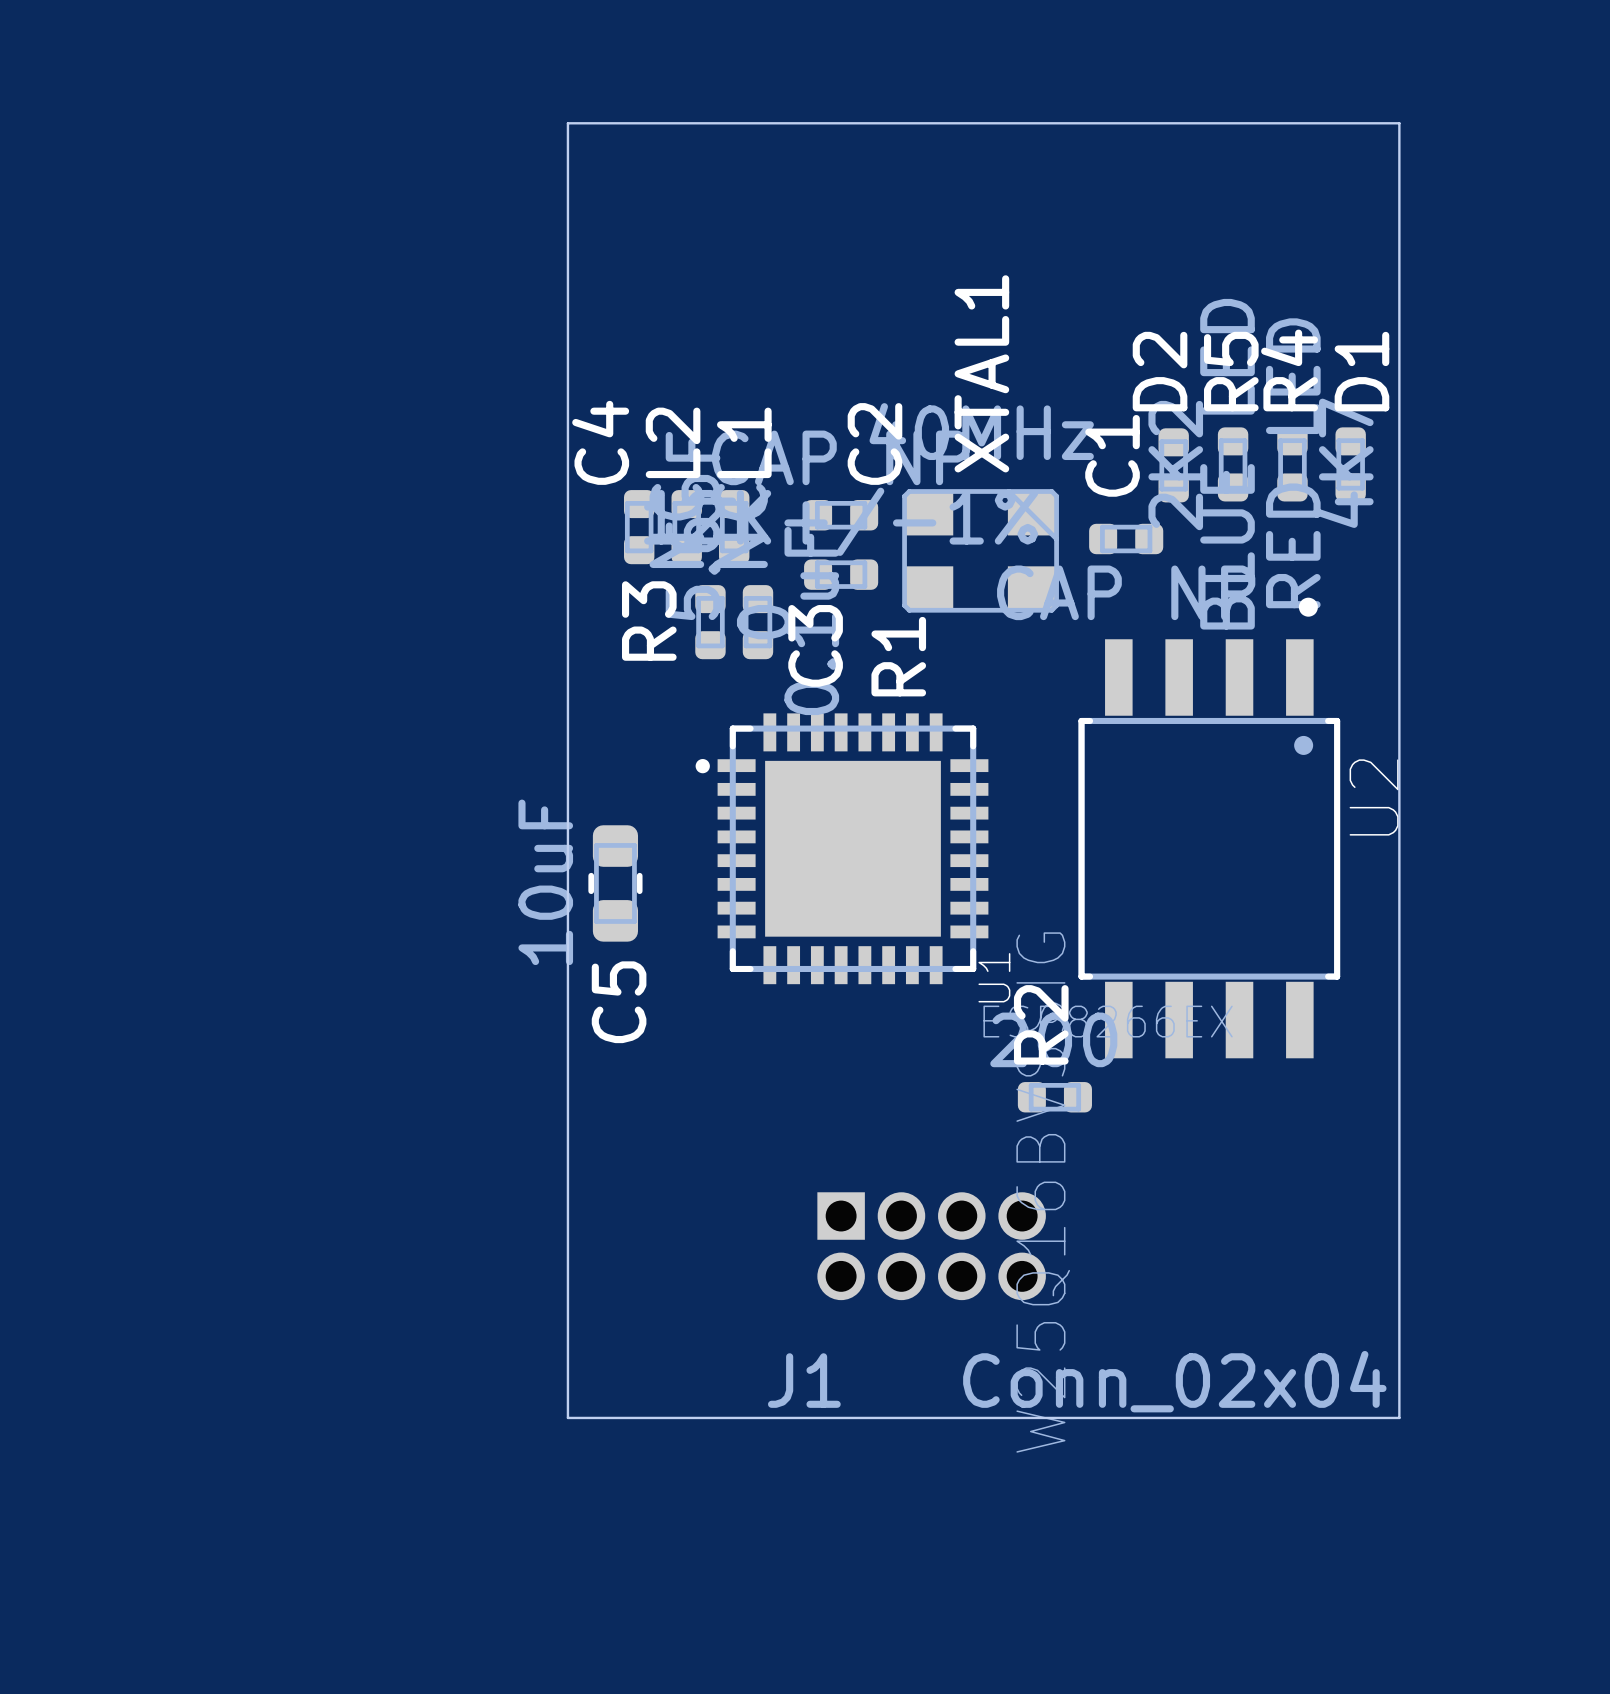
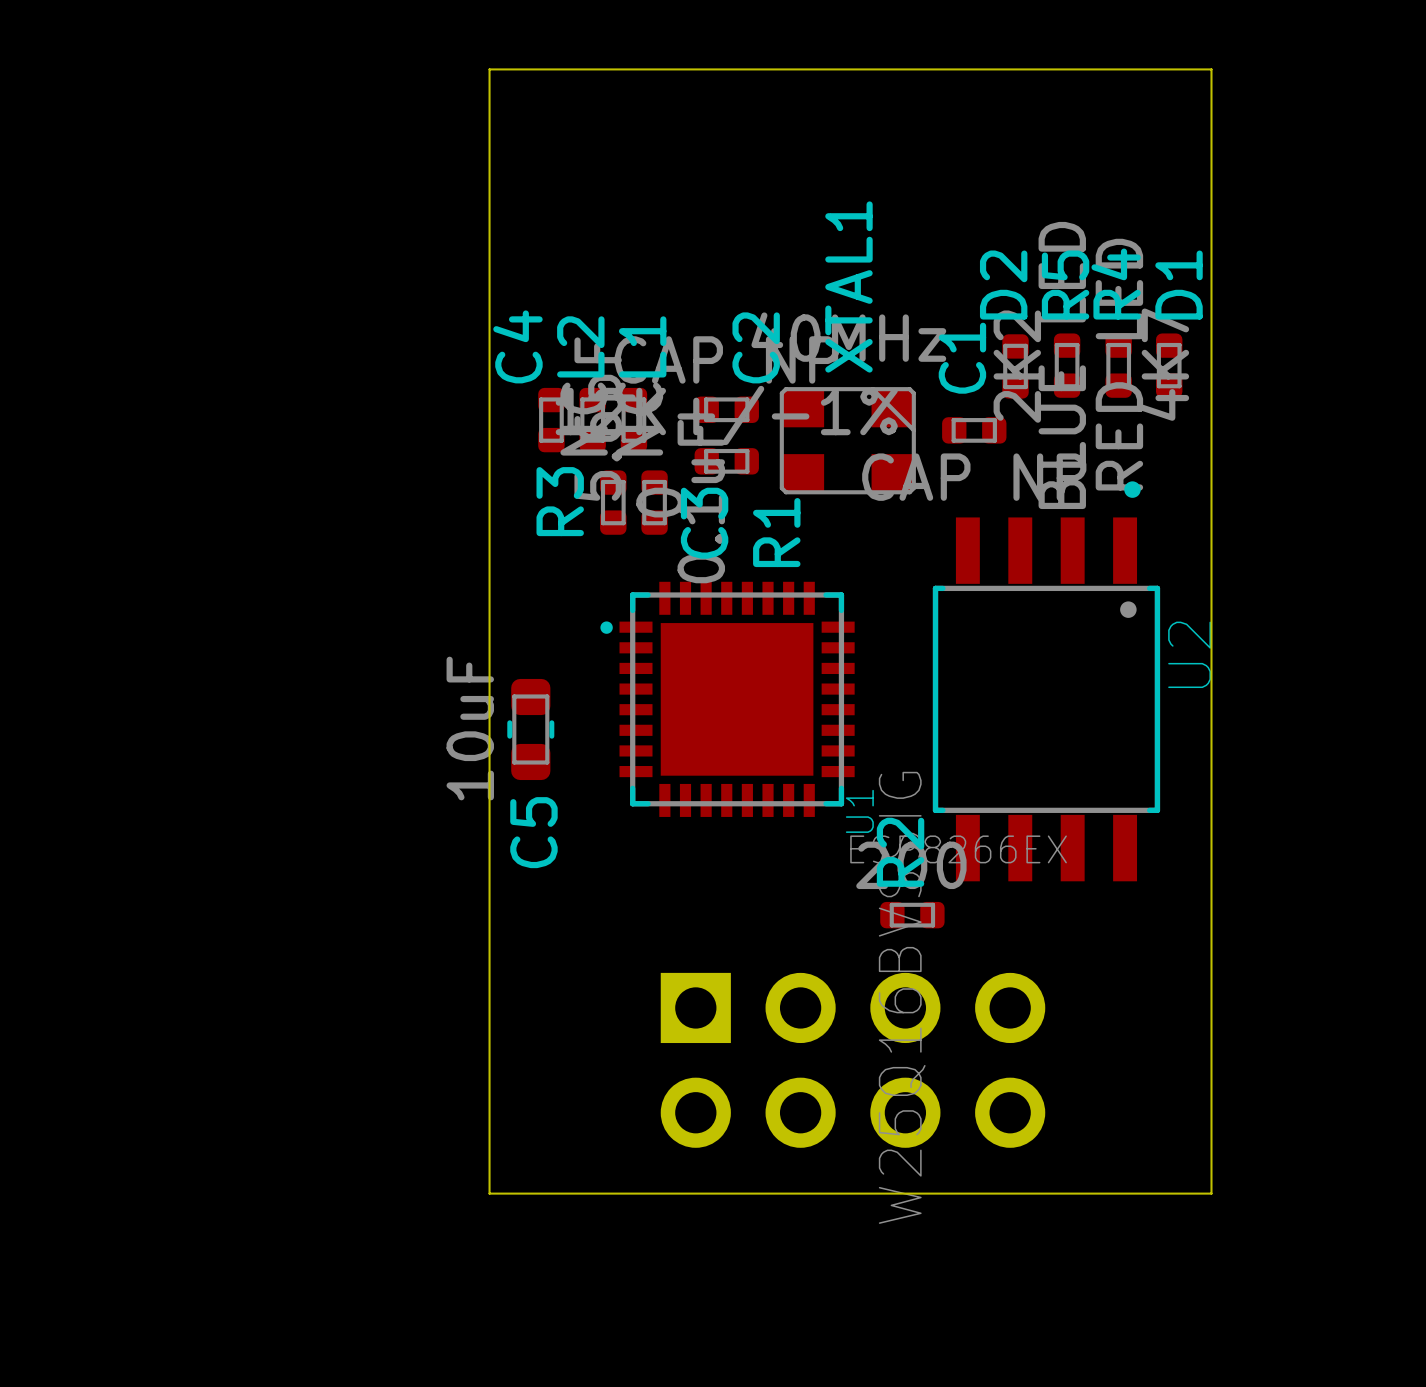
J1: Conn_02x04 (931, 1246) -> none
part: none -> (852, 1060)

